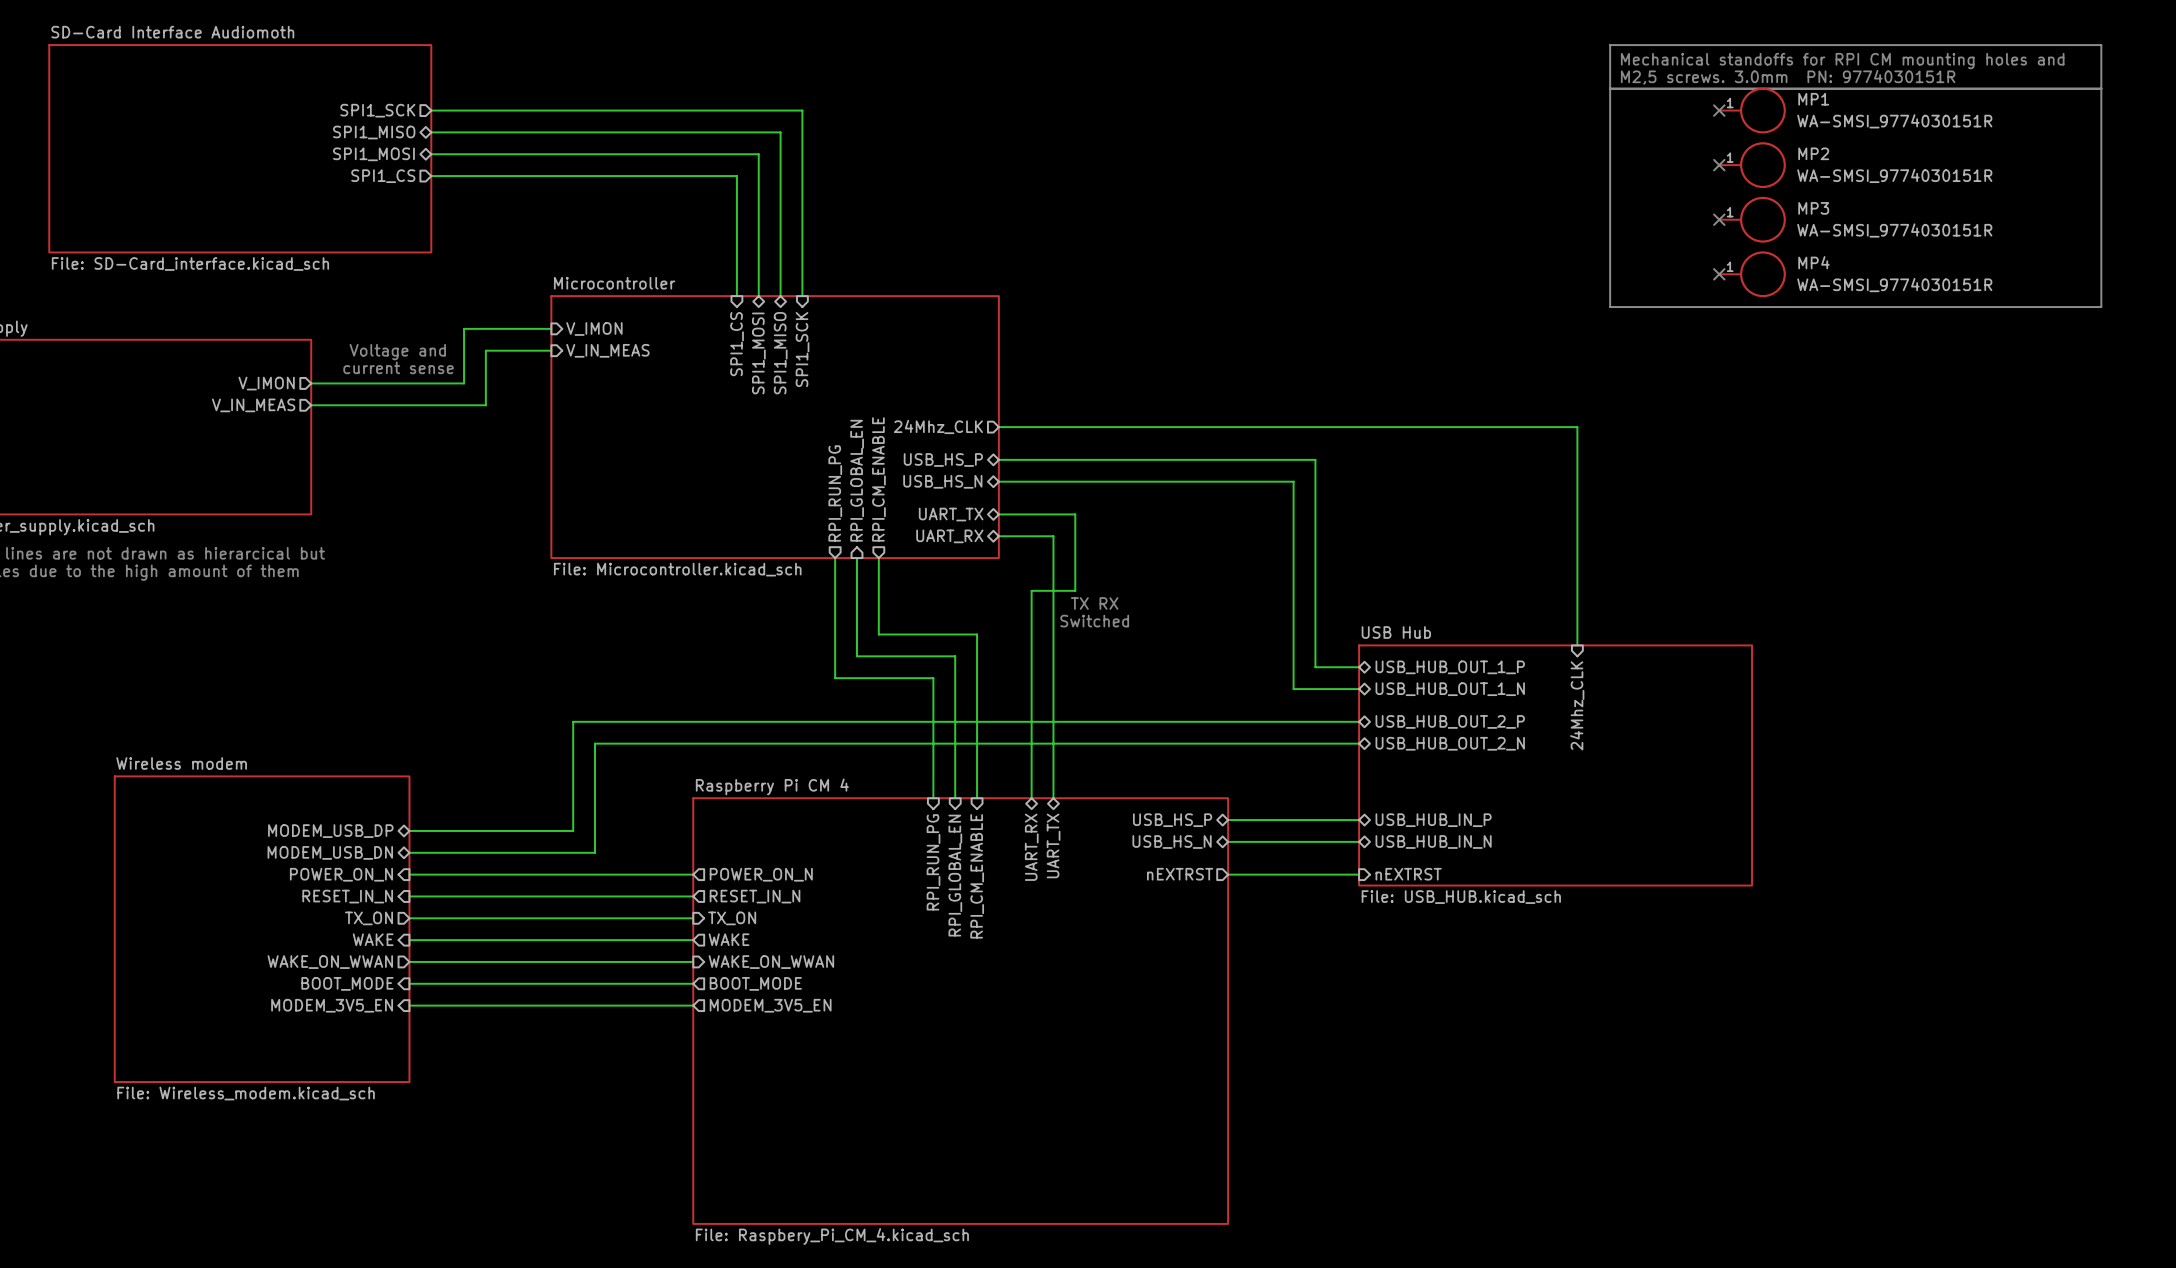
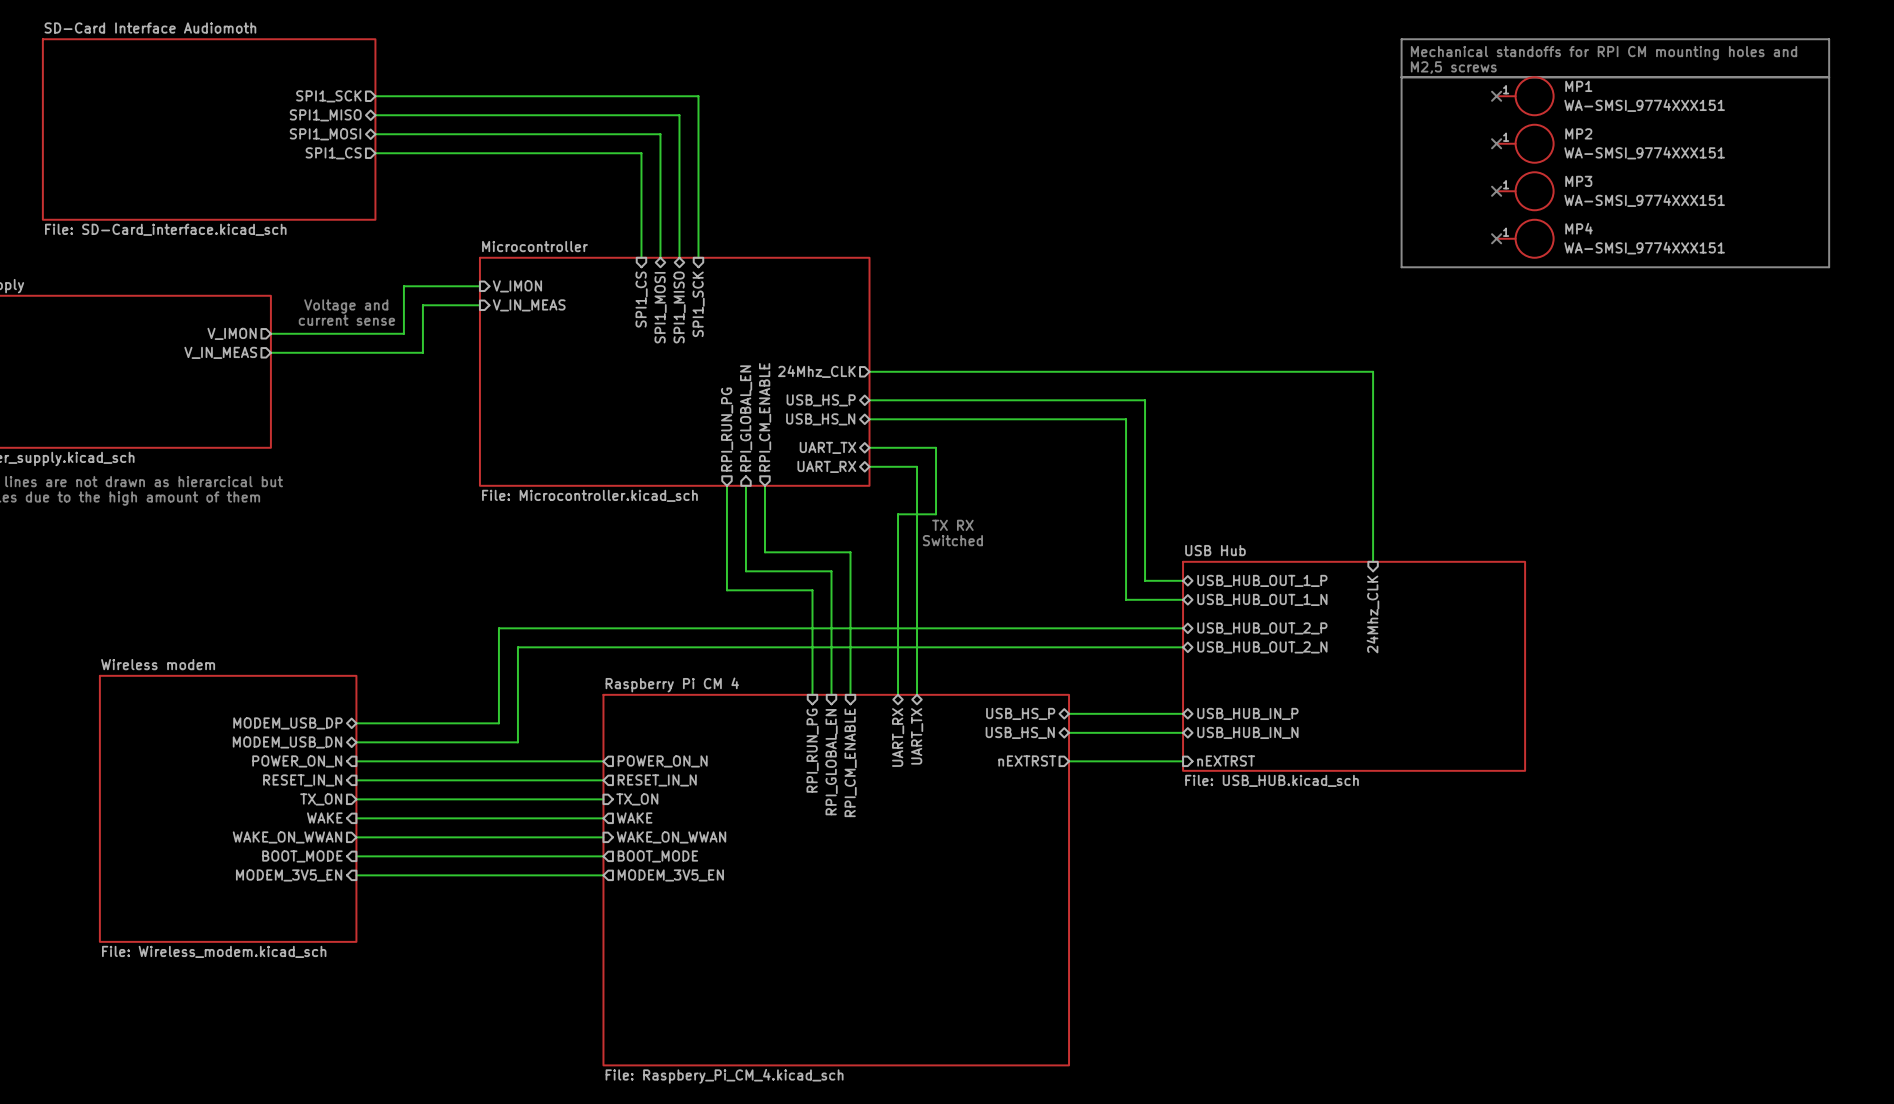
text: M2,5 screws. 3.0mm PN: 9774030151R (1788, 77) -> M2,5 screws (1453, 67)
MP1 value: WA-SMSI_9774030151R (1894, 121) -> WA-SMSI_9774XXX151 (1644, 105)
MP2 value: WA-SMSI_9774030151R (1894, 175) -> WA-SMSI_9774XXX151 (1644, 153)
MP3 value: WA-SMSI_9774030151R (1894, 230) -> WA-SMSI_9774XXX151 (1644, 200)
MP4 value: WA-SMSI_9774030151R (1894, 285) -> WA-SMSI_9774XXX151 (1644, 248)

